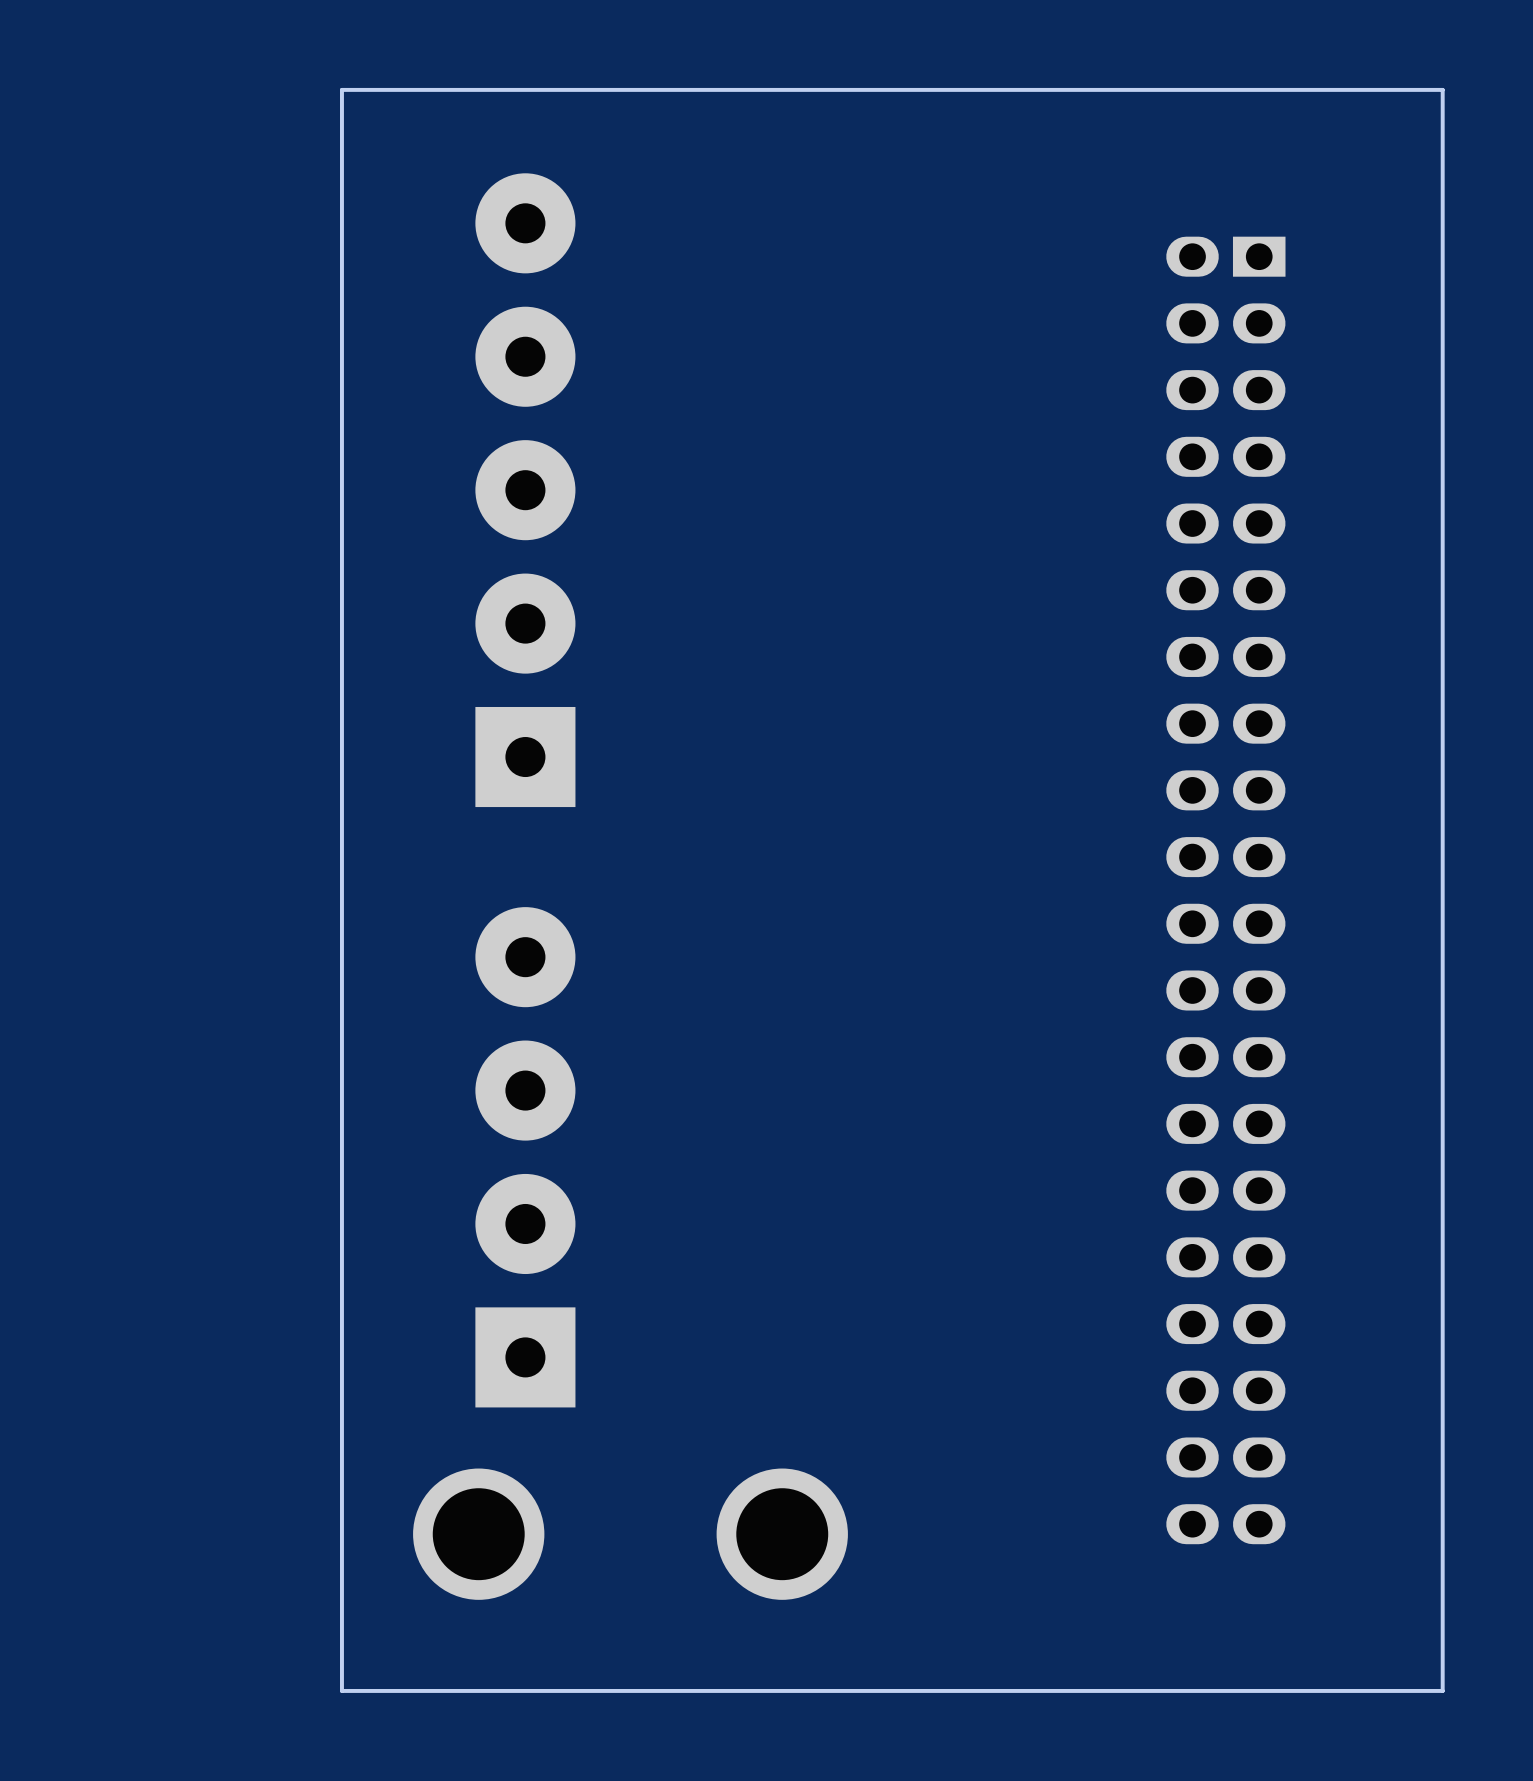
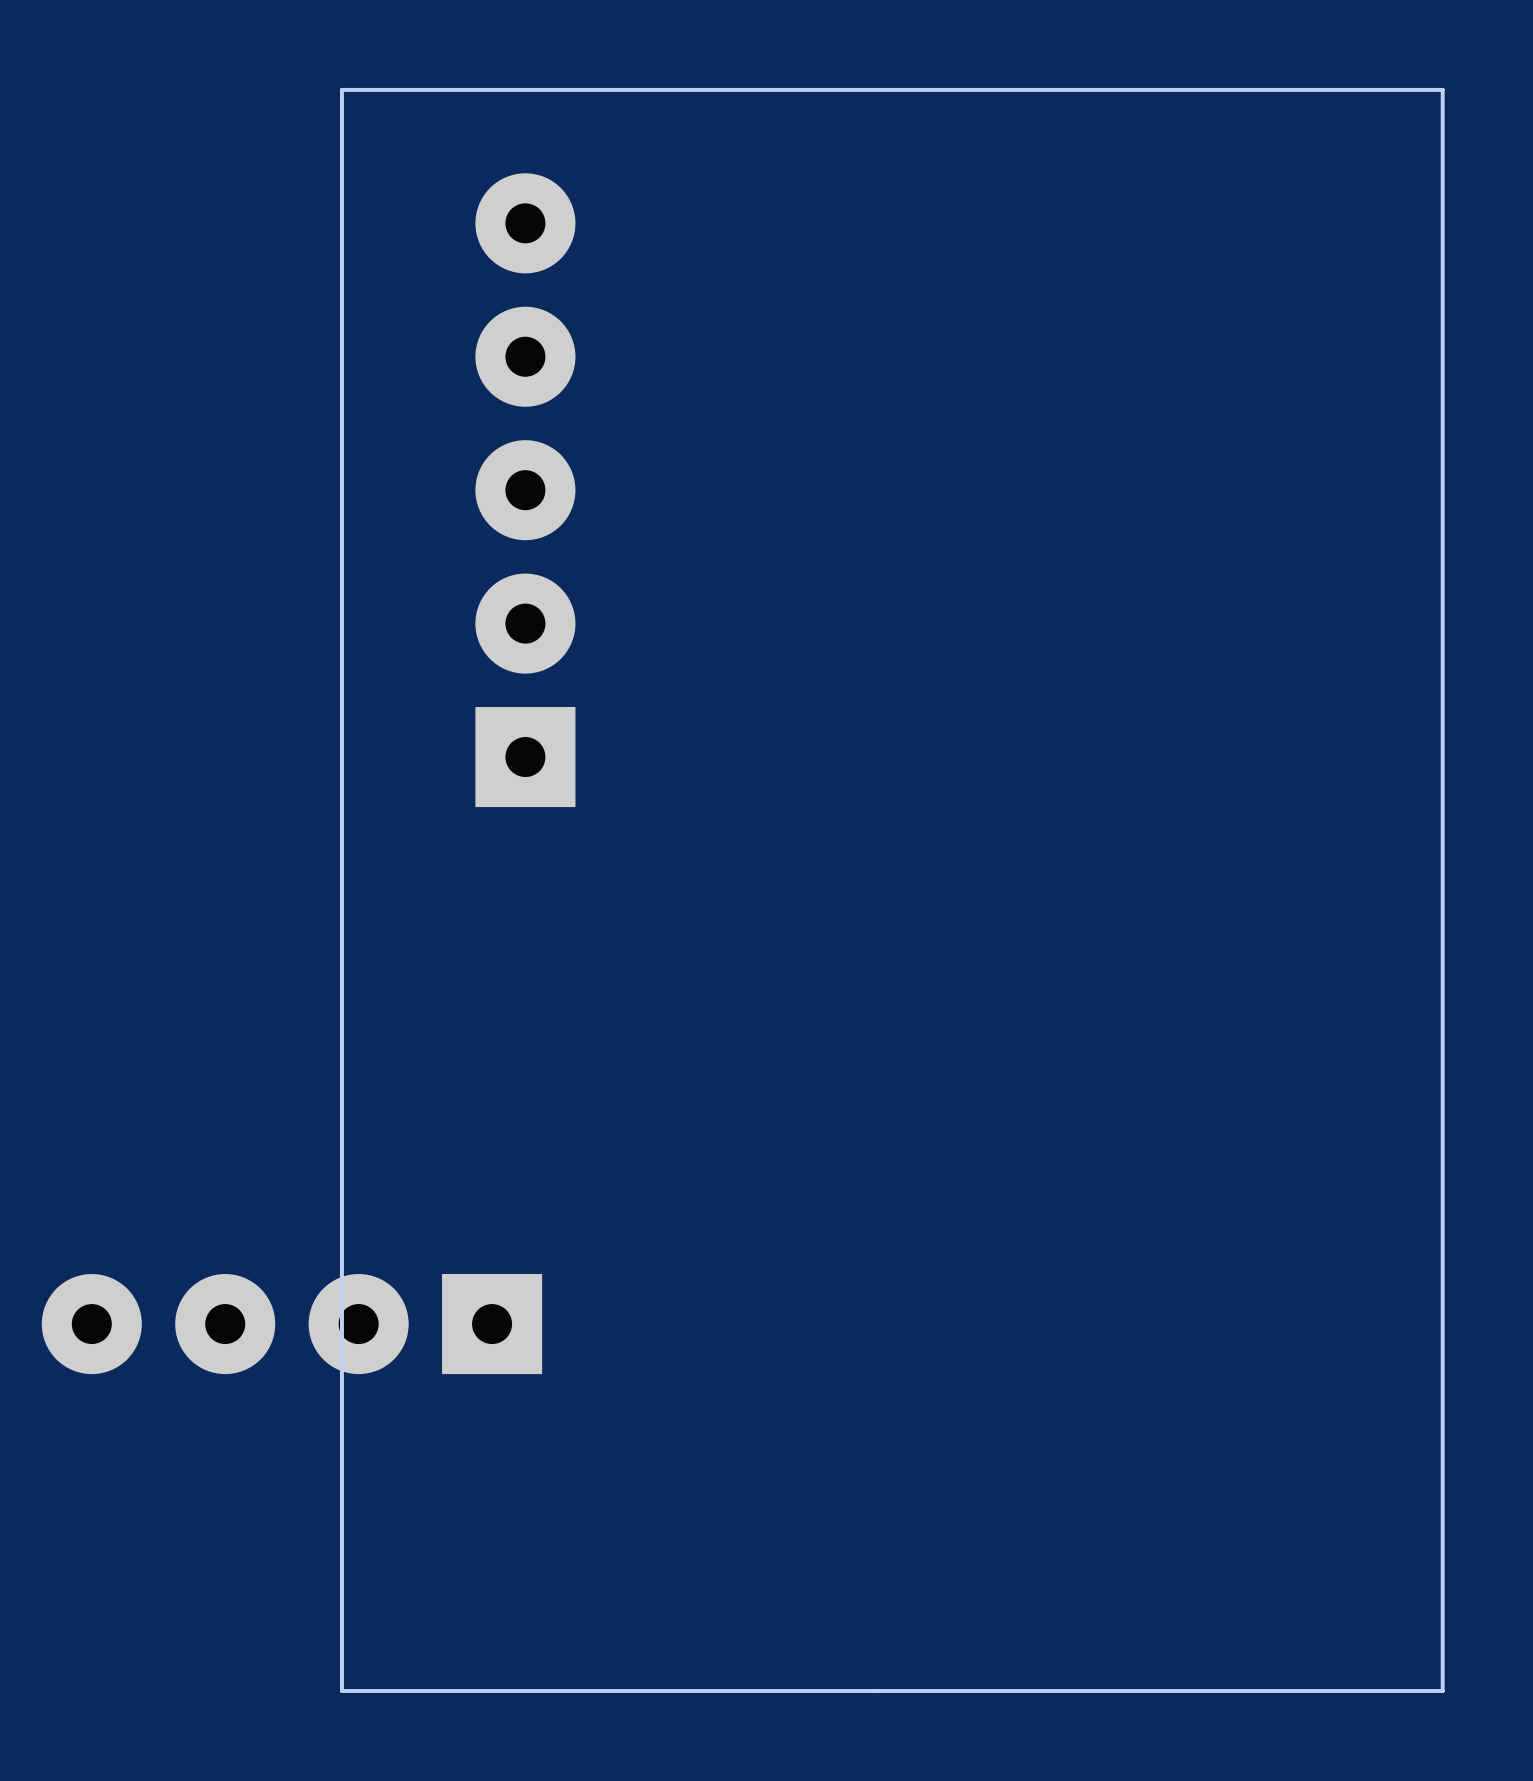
part: (1225, 890) -> none
part rotation: 0° (525, 1157) -> 90° counterclockwise (291, 1324)
part: (478, 1534) -> none
part: (782, 1534) -> none

